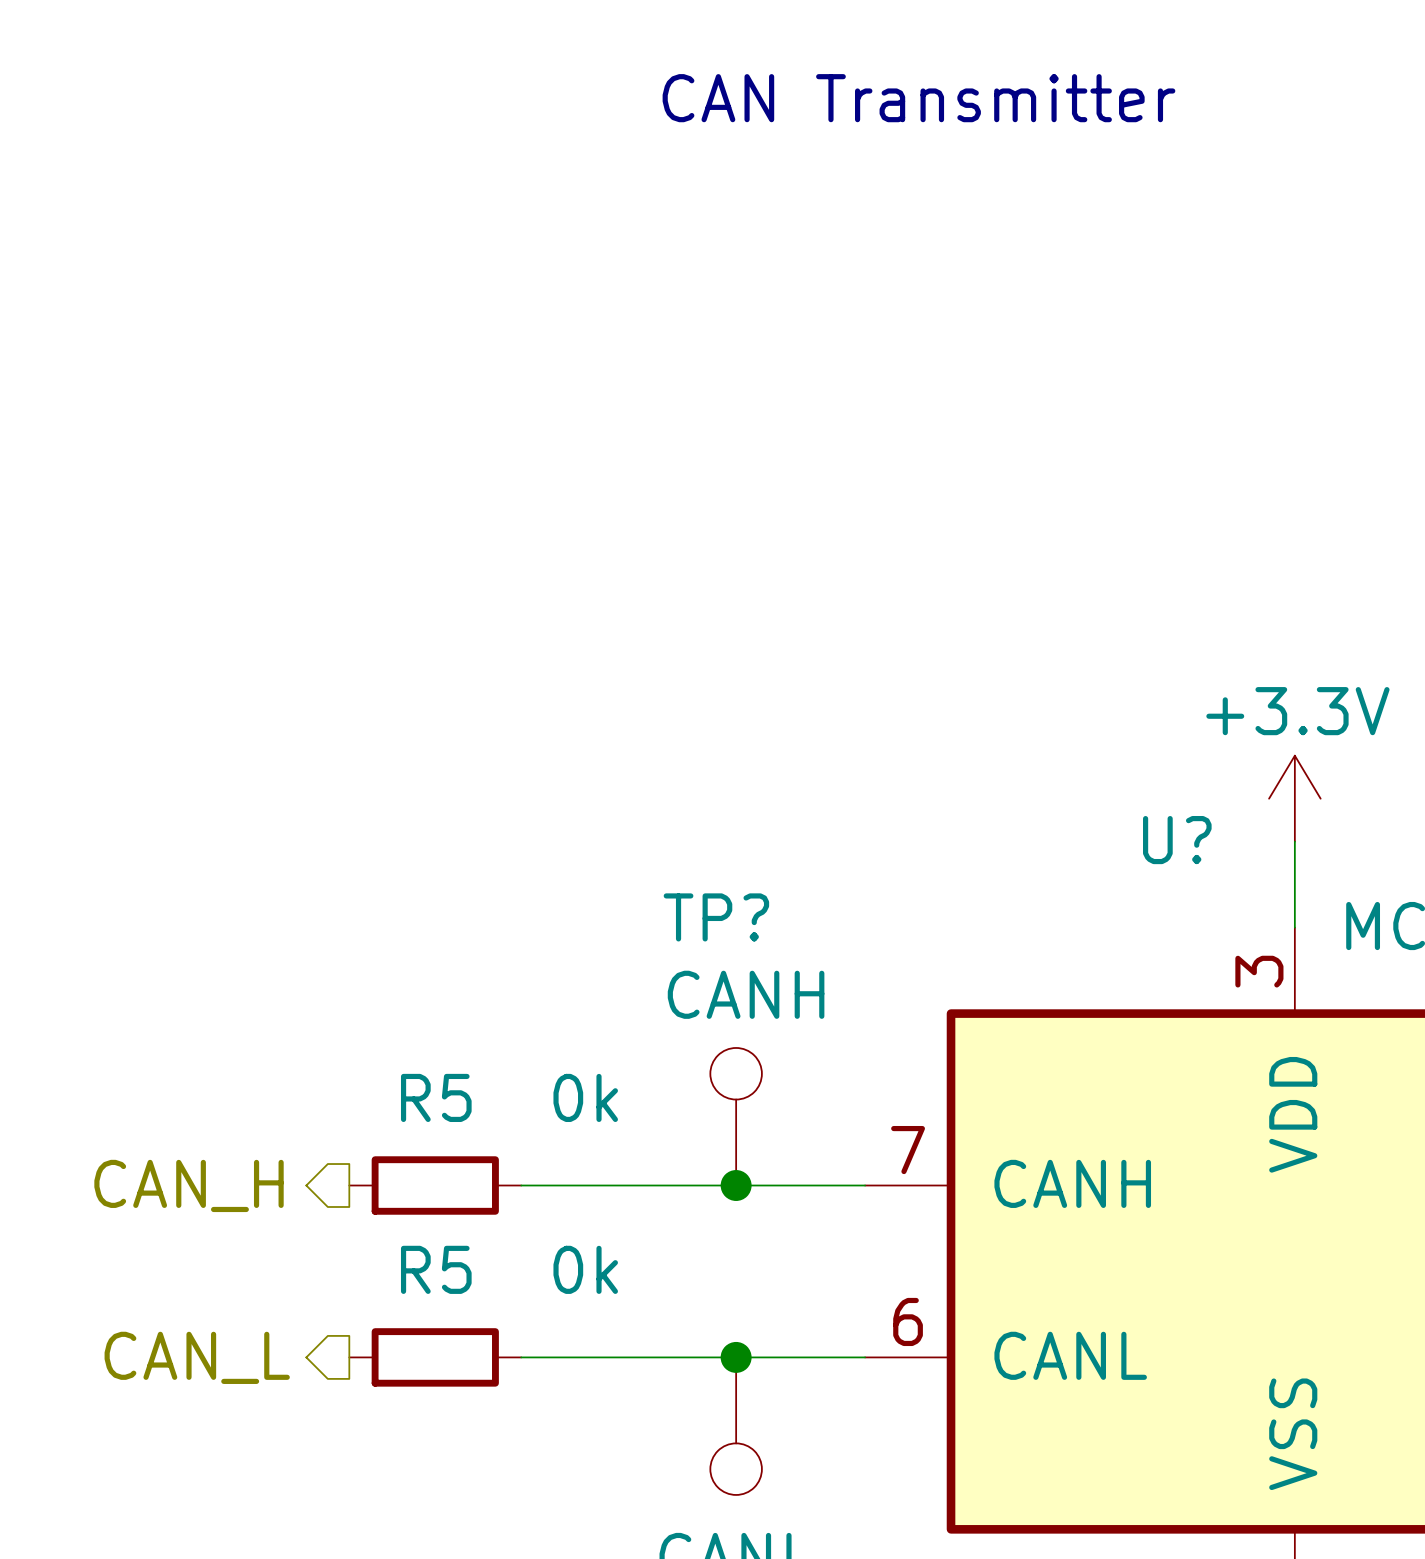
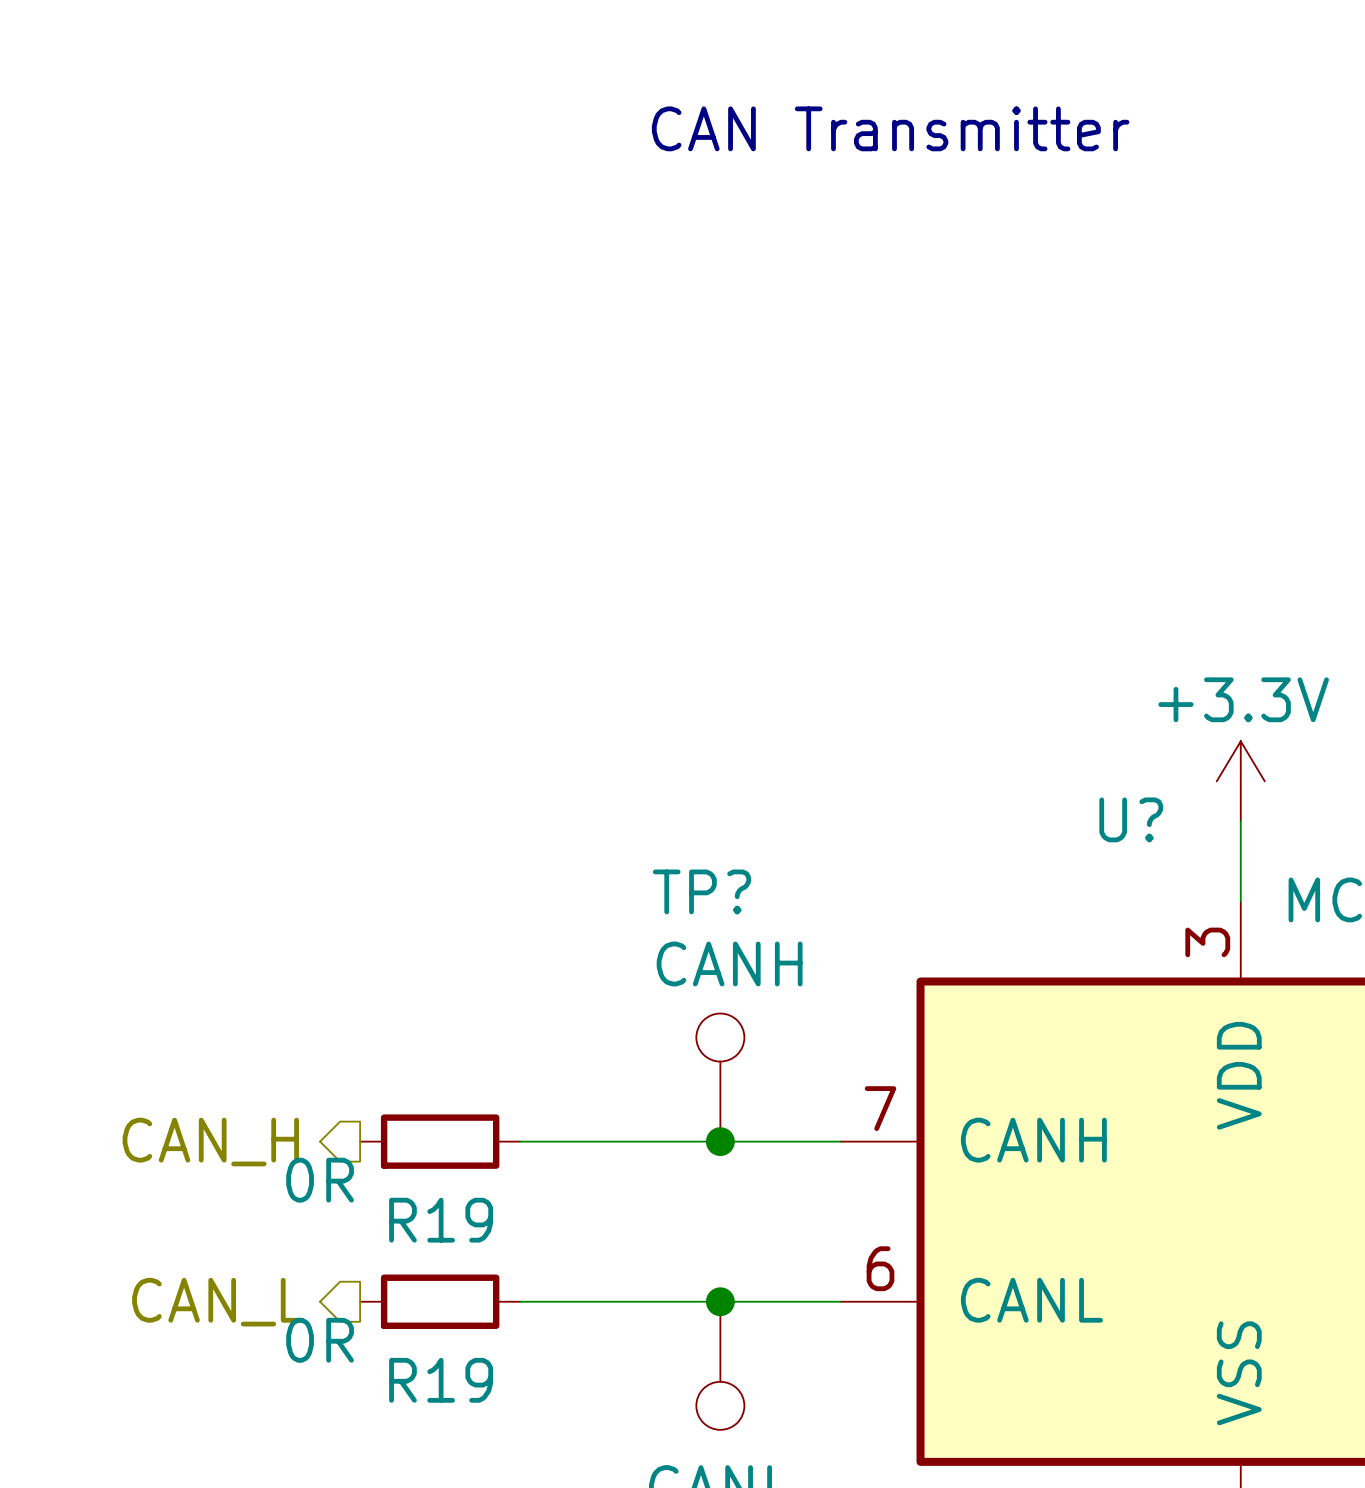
R5 name: R5 (436, 1097) -> R19 (441, 1220)
R5 value: 0k (585, 1097) -> 0R (320, 1180)
R5 name: R5 (436, 1269) -> R19 (441, 1380)
R5 value: 0k (585, 1269) -> 0R (320, 1340)

